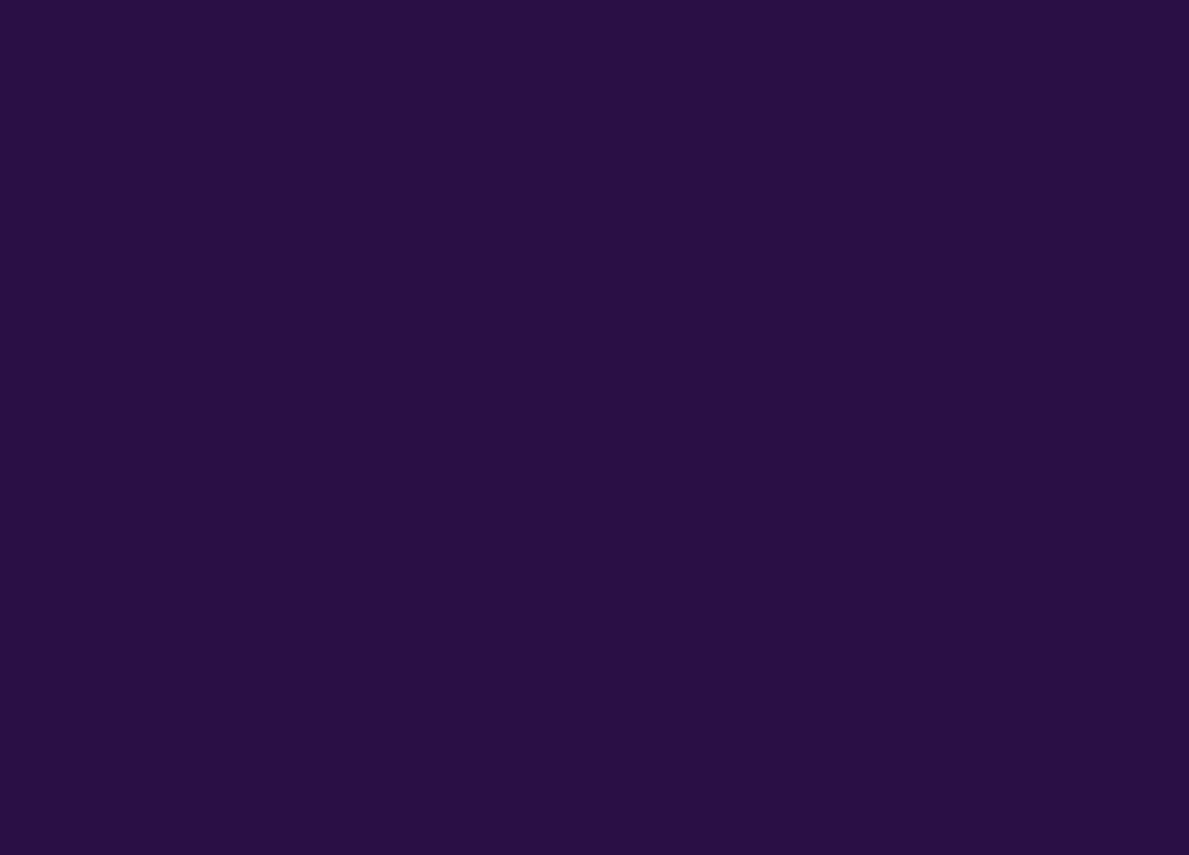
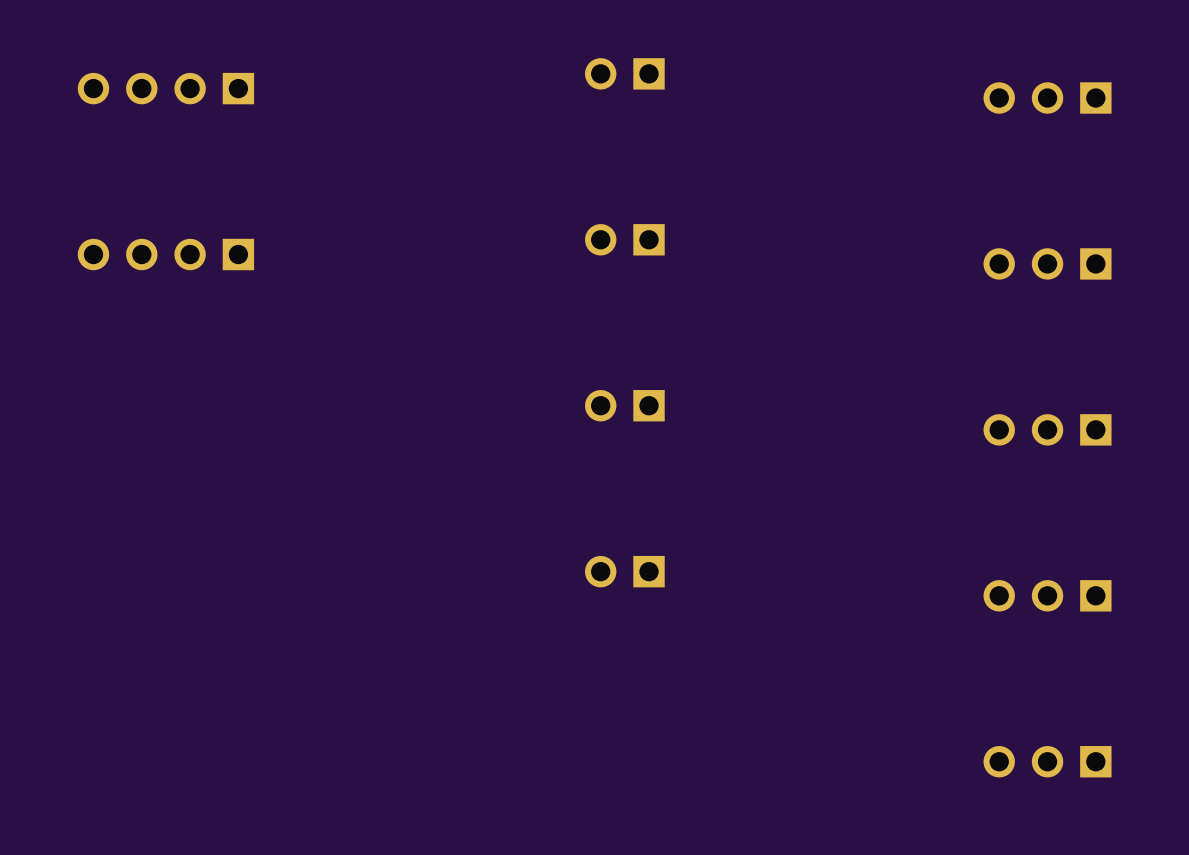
part: none -> (624, 73)
part: none -> (165, 88)
part: none -> (1047, 98)
part: none -> (624, 239)
part: none -> (165, 254)
part: none -> (1047, 263)
part: none -> (624, 405)
part: none -> (1047, 429)
part: none -> (624, 571)
part: none -> (1047, 595)
part: none -> (1047, 761)

